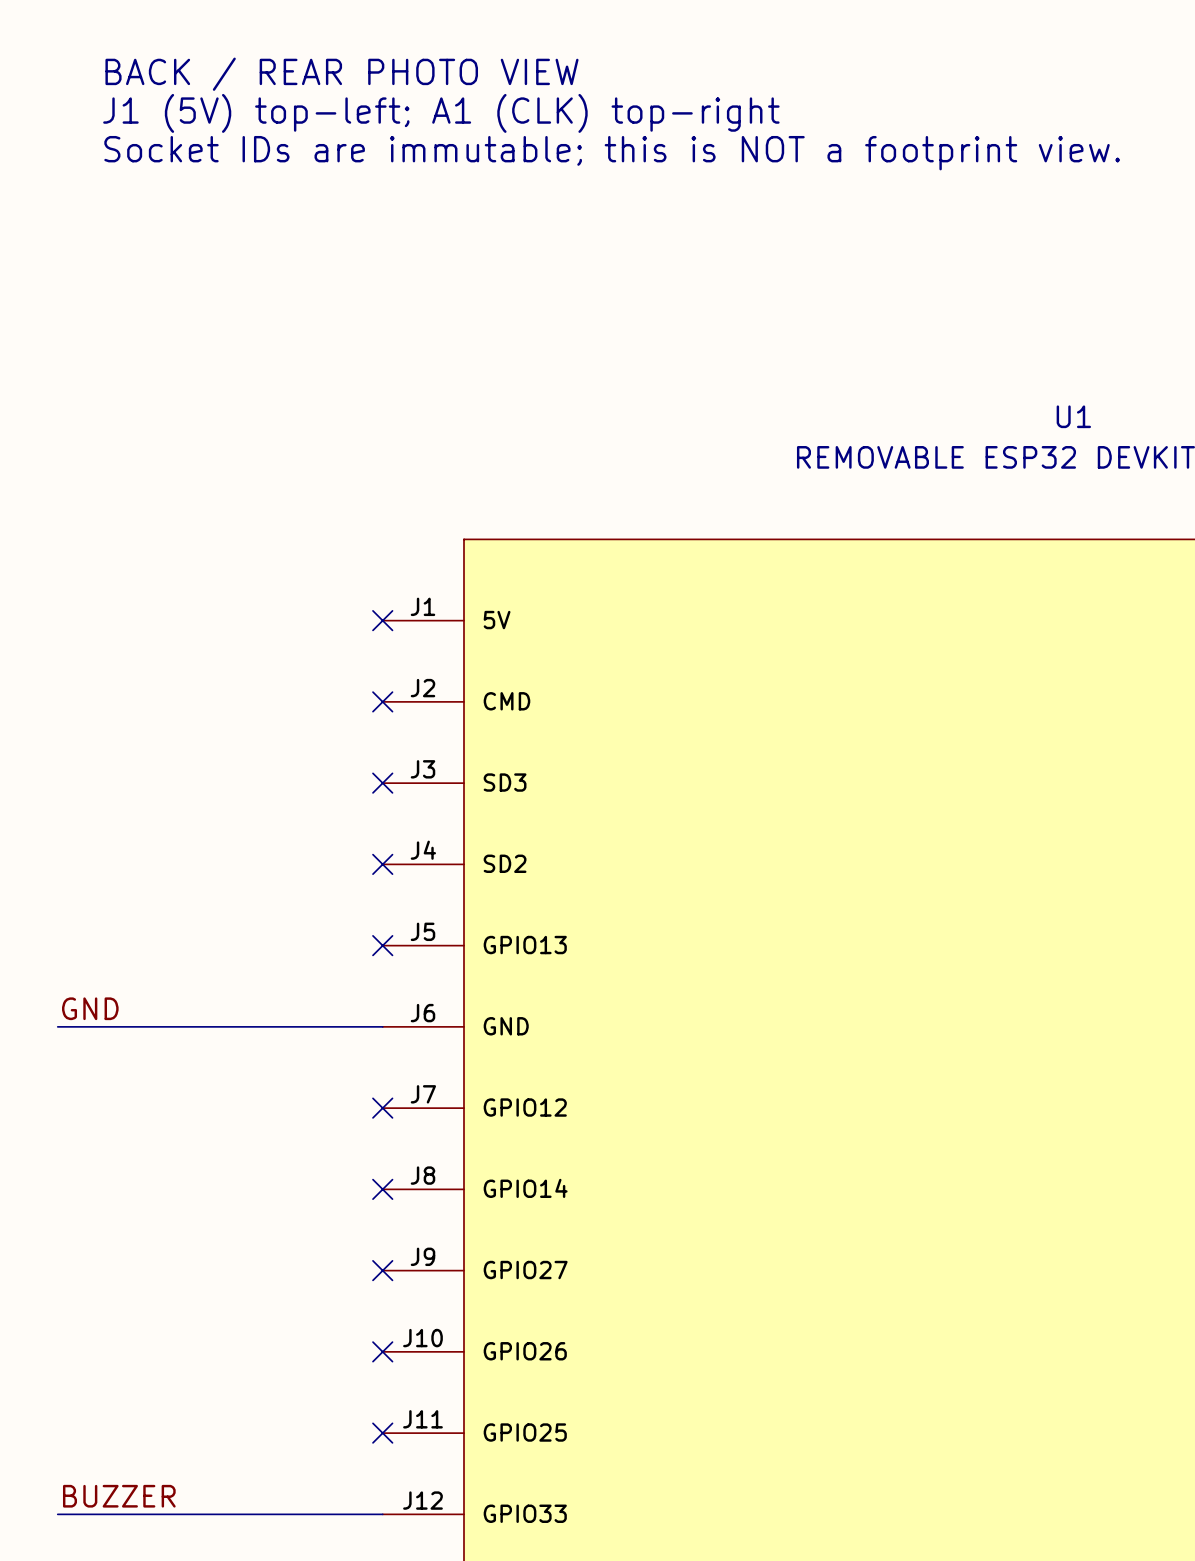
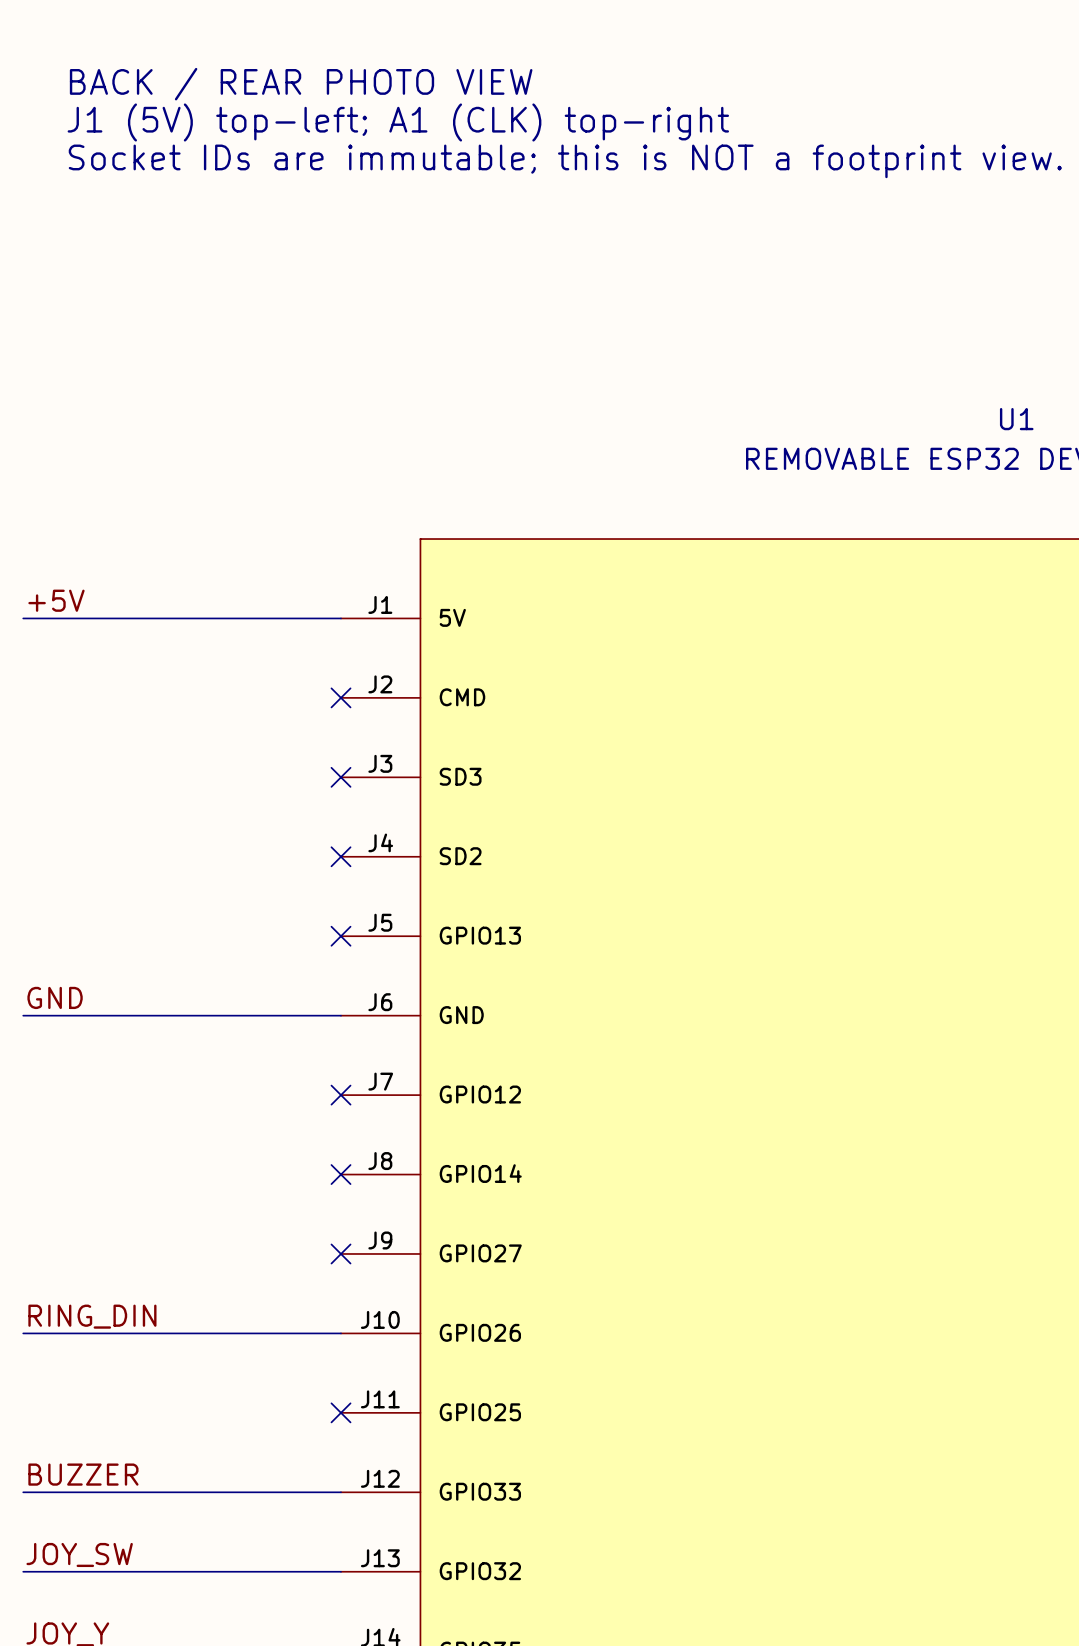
label: none -> +5V (56, 600)
wire: none -> (23, 618) (341, 618)
no-connect mark: (382, 620) -> none
label: none -> RING_DIN (92, 1316)
wire: none -> (23, 1333) (341, 1333)
no-connect mark: (382, 1351) -> none

